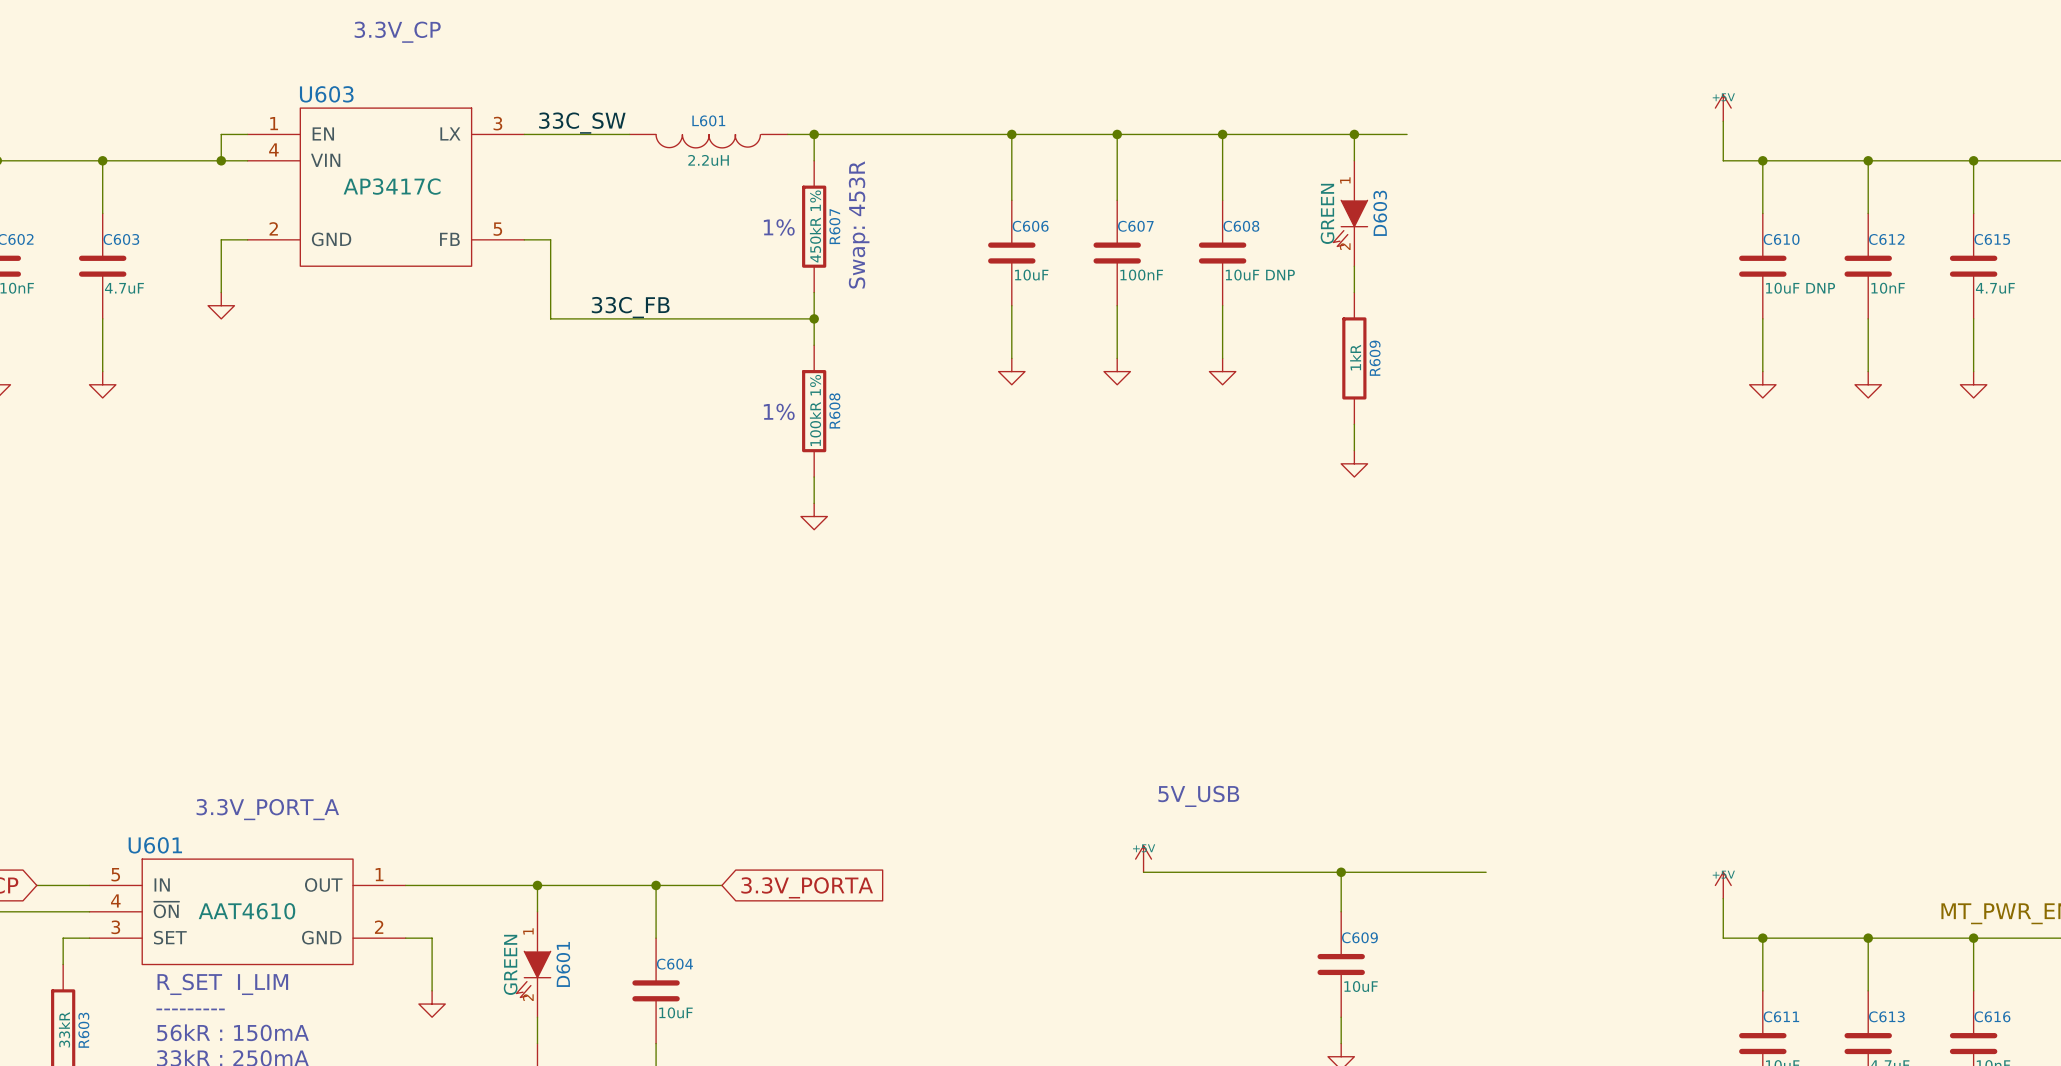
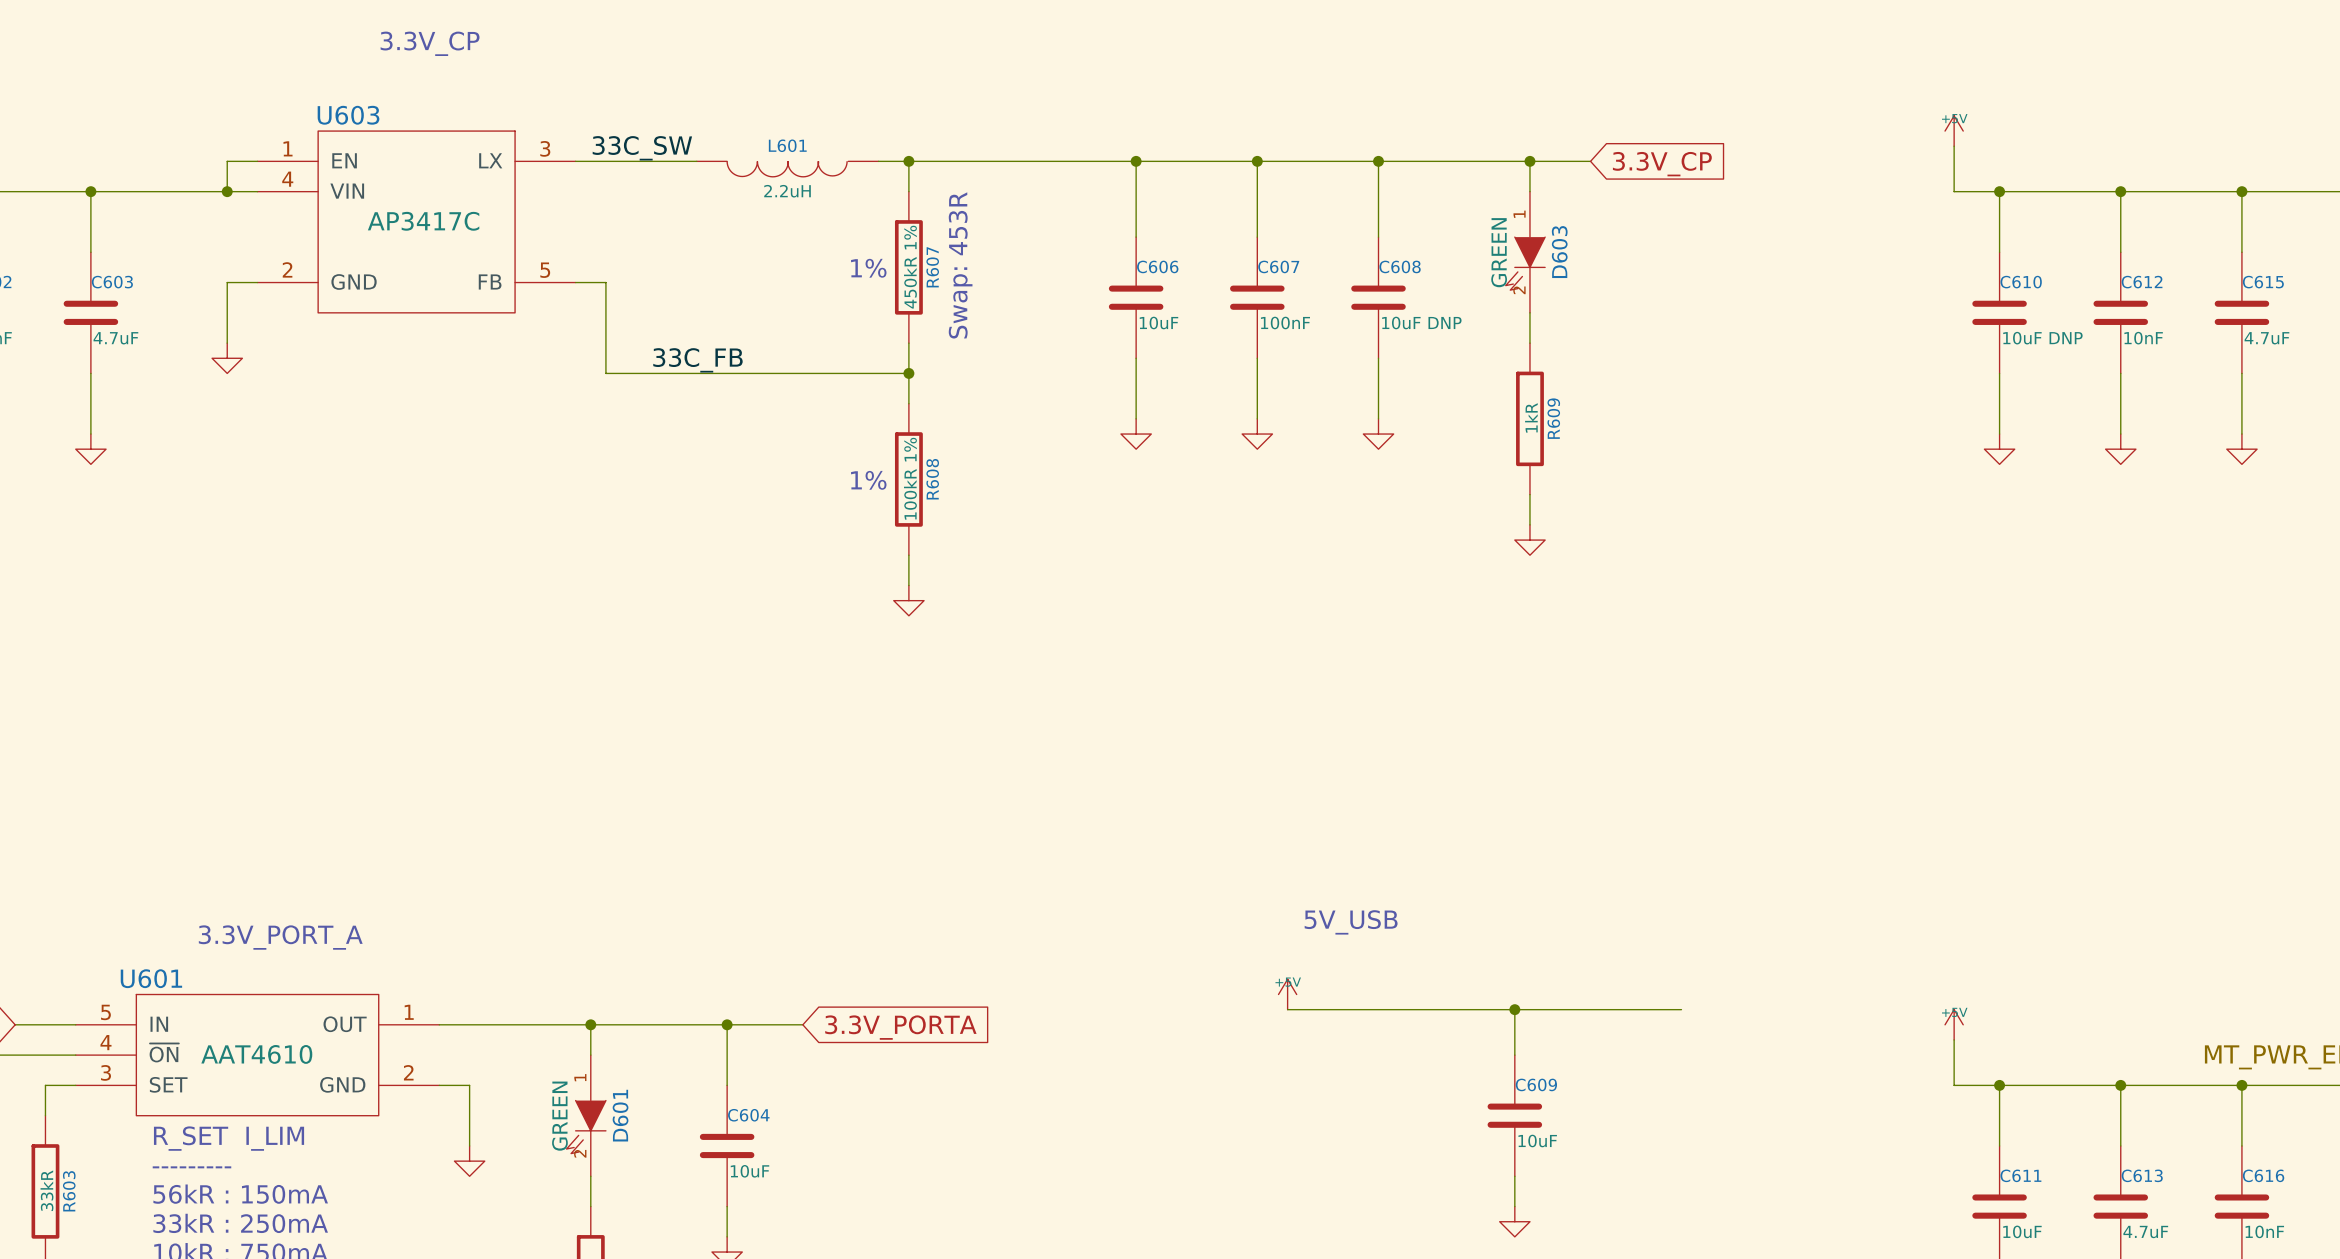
global label: none -> 3.3V_CP (1662, 164)

